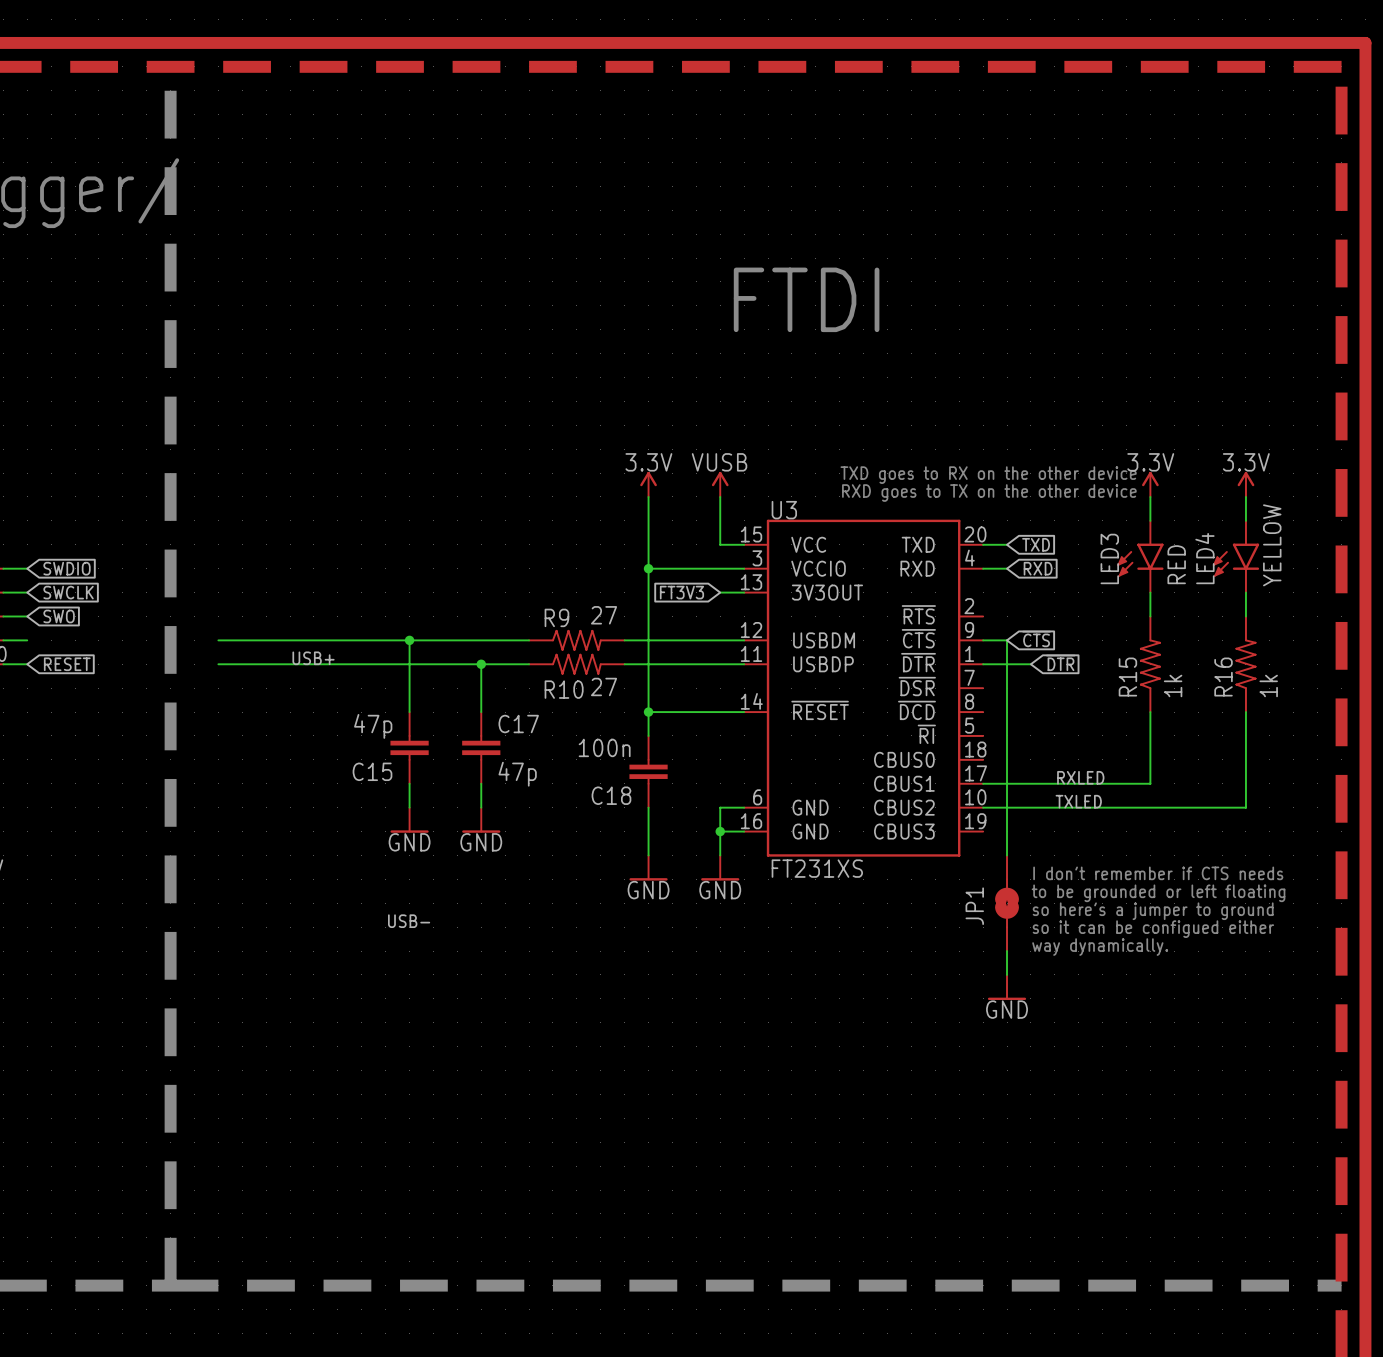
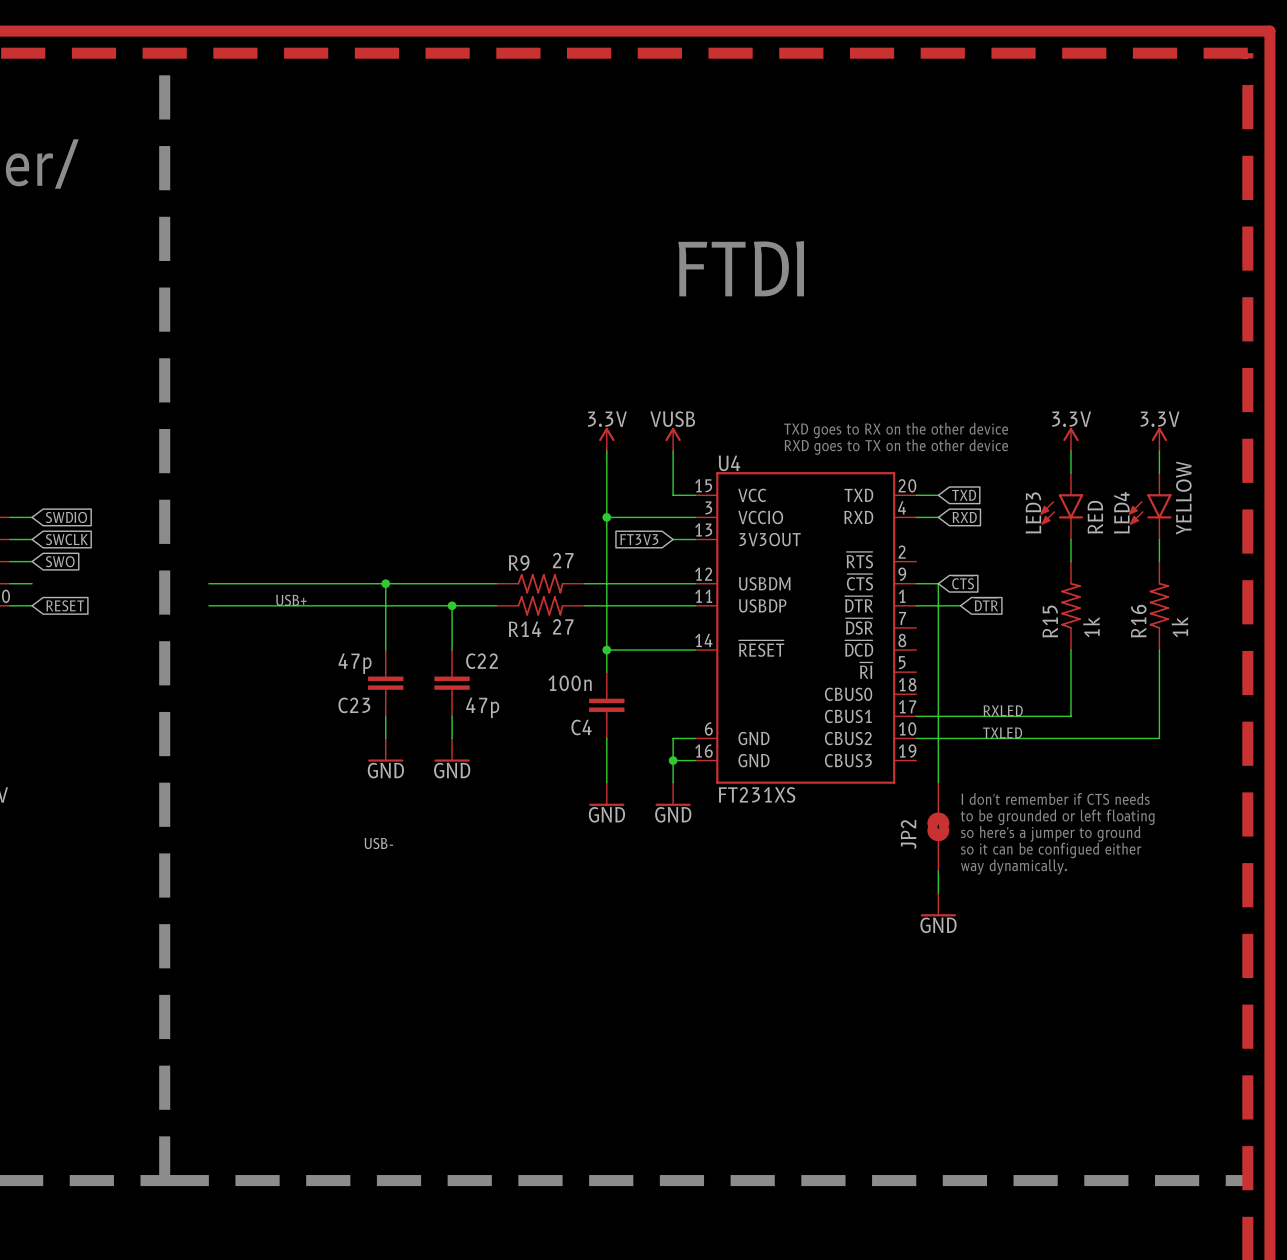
U3 name: U3 (784, 510) -> U4 (729, 463)
R10 name: R10 (564, 689) -> R14 (524, 629)
C17 name: C17 (518, 724) -> C22 (482, 661)
C15 name: C15 (372, 771) -> C23 (354, 705)
C18 name: C18 (611, 795) -> C4 (581, 727)
JP1 name: JP1 (974, 906) -> JP2 (908, 834)

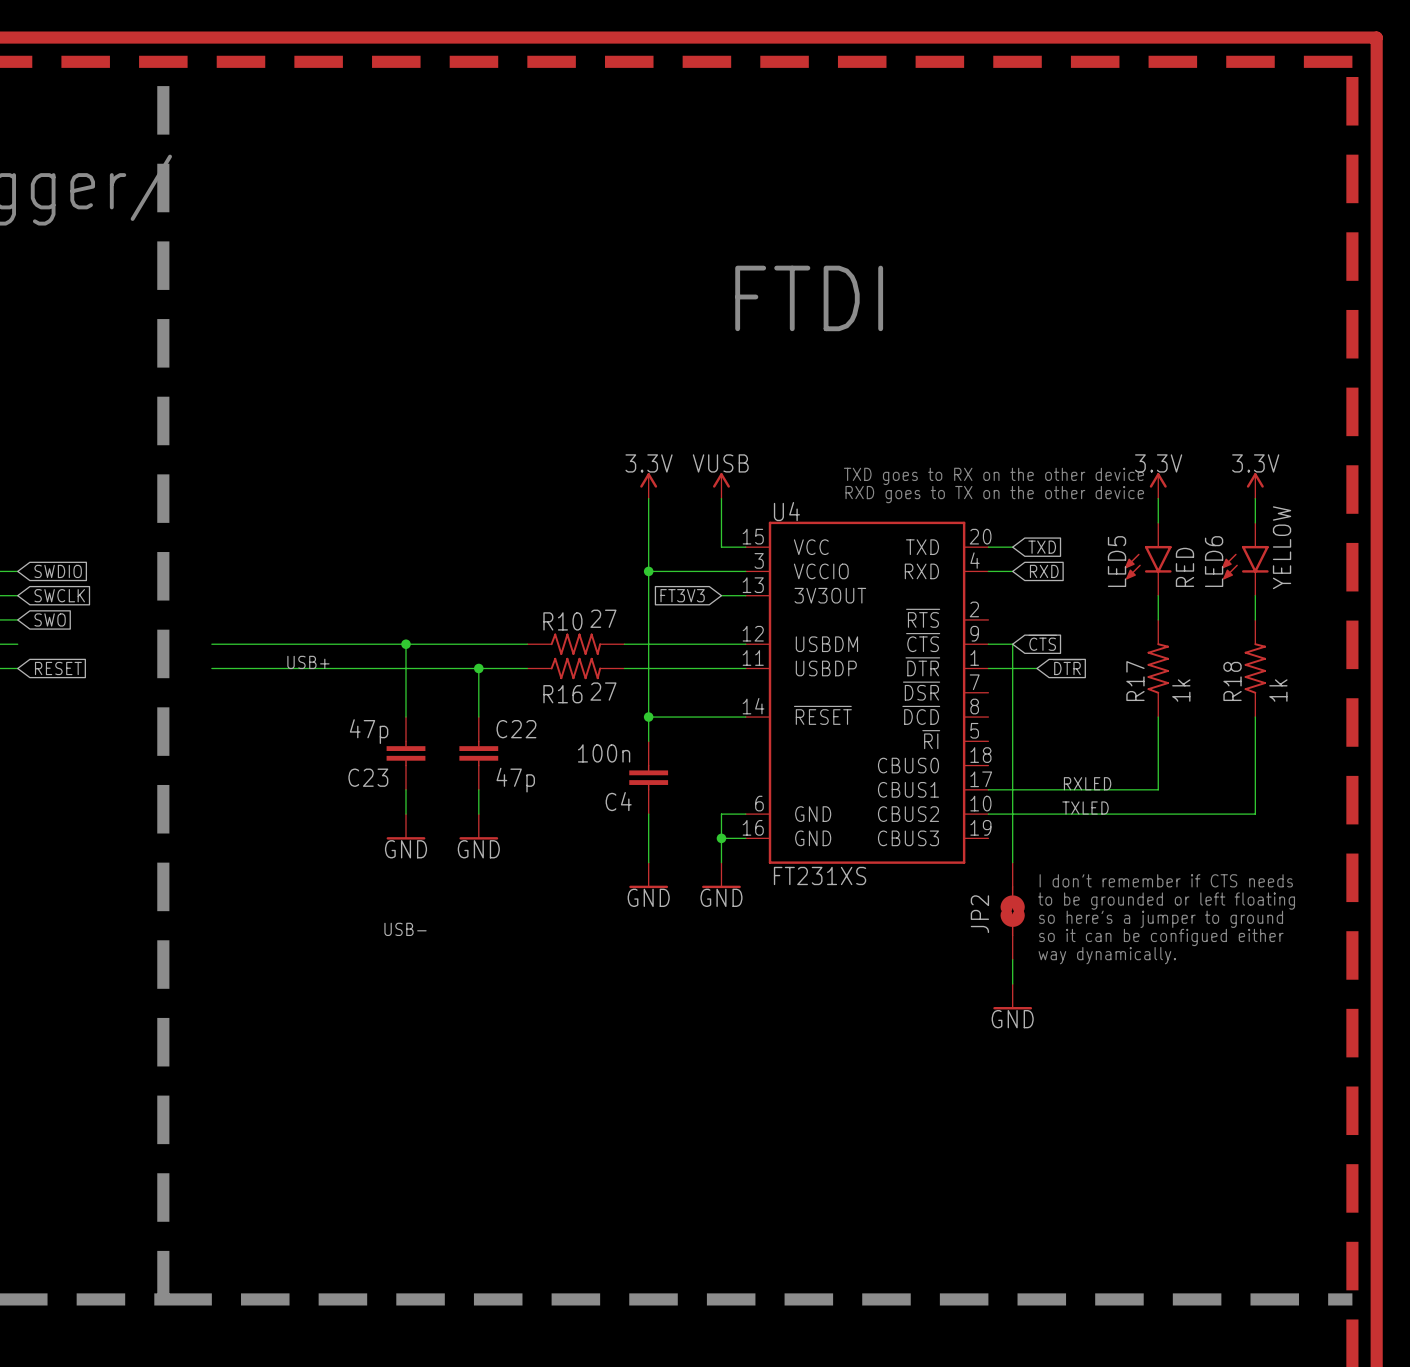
LED4 name: LED4 (1121, 512) -> LED6 (1214, 561)
LED3 name: LED3 (1033, 513) -> LED5 (1117, 561)
R9 name: R9 (519, 563) -> R10 (562, 621)
R15 name: R15 (1050, 621) -> R17 (1135, 681)
R16 name: R16 (1138, 621) -> R18 (1232, 681)
R14 name: R14 (524, 629) -> R16 (562, 694)

